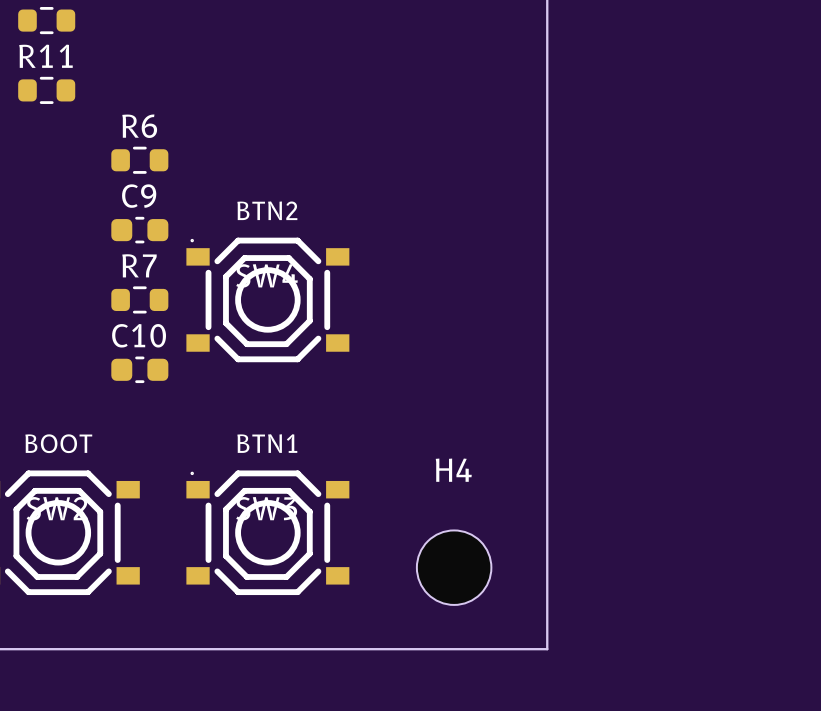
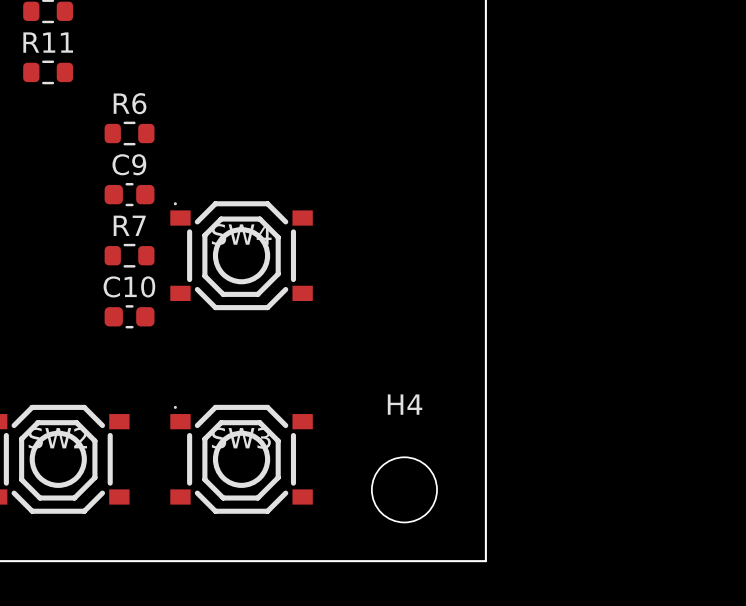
text: BTN2 (267, 210) -> none
text: BOOT (58, 443) -> none
text: BTN1 (267, 443) -> none

